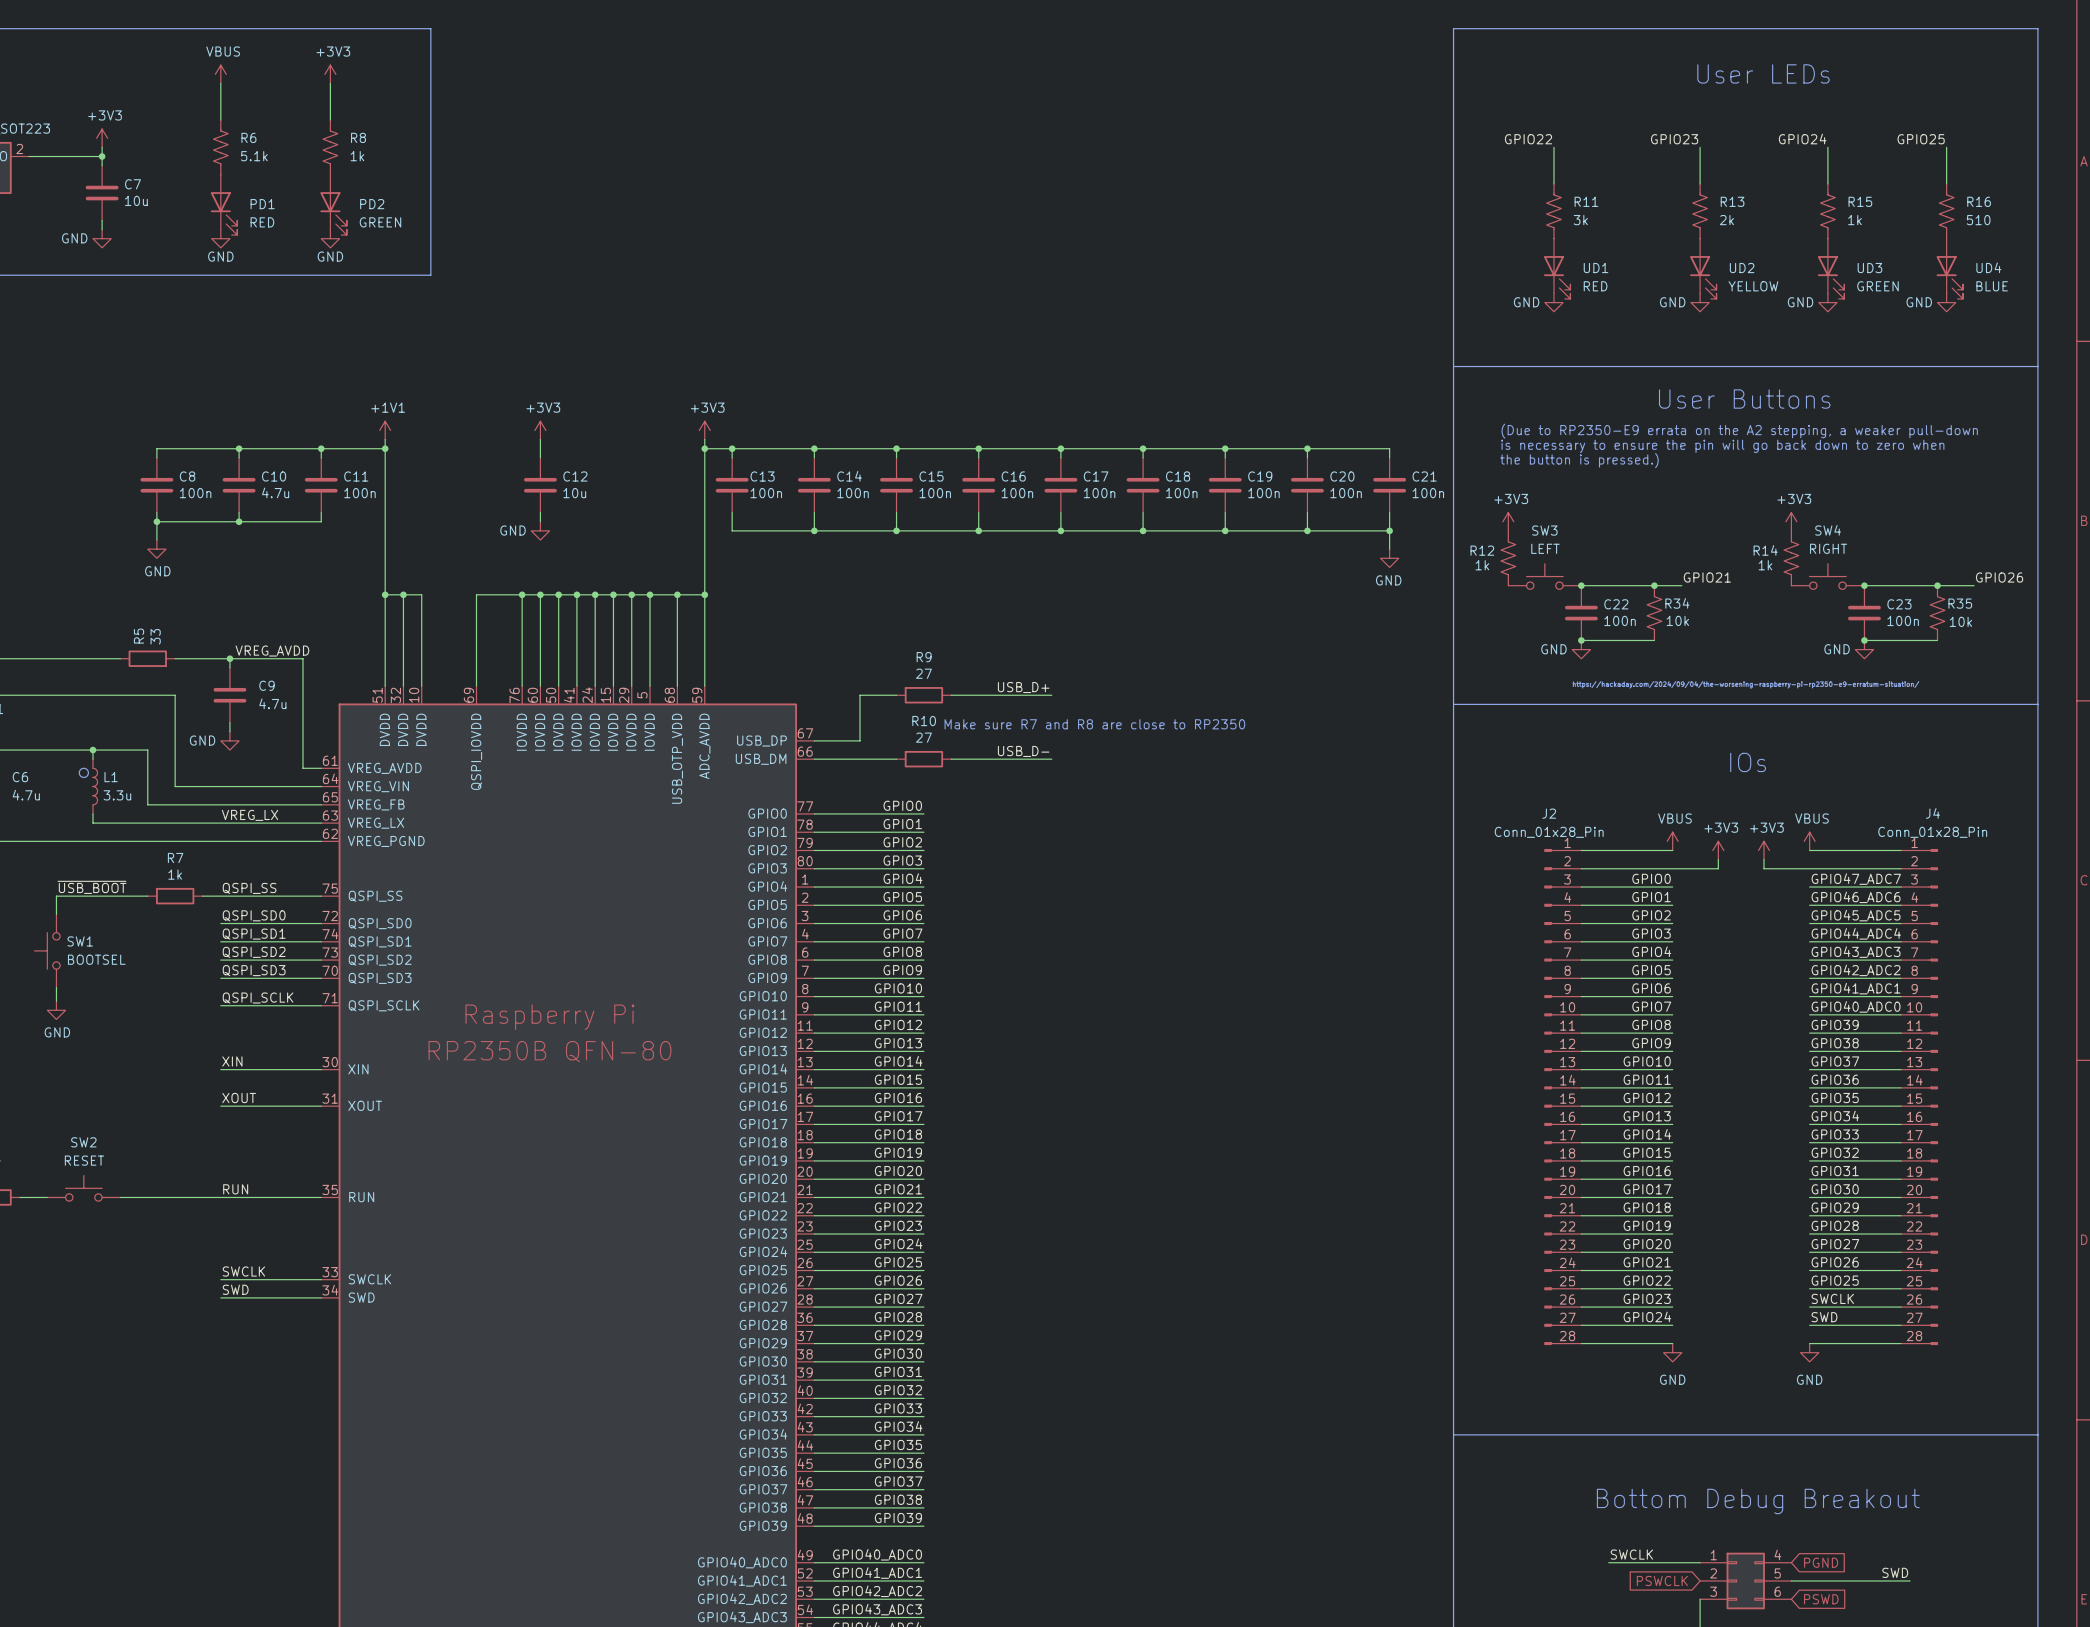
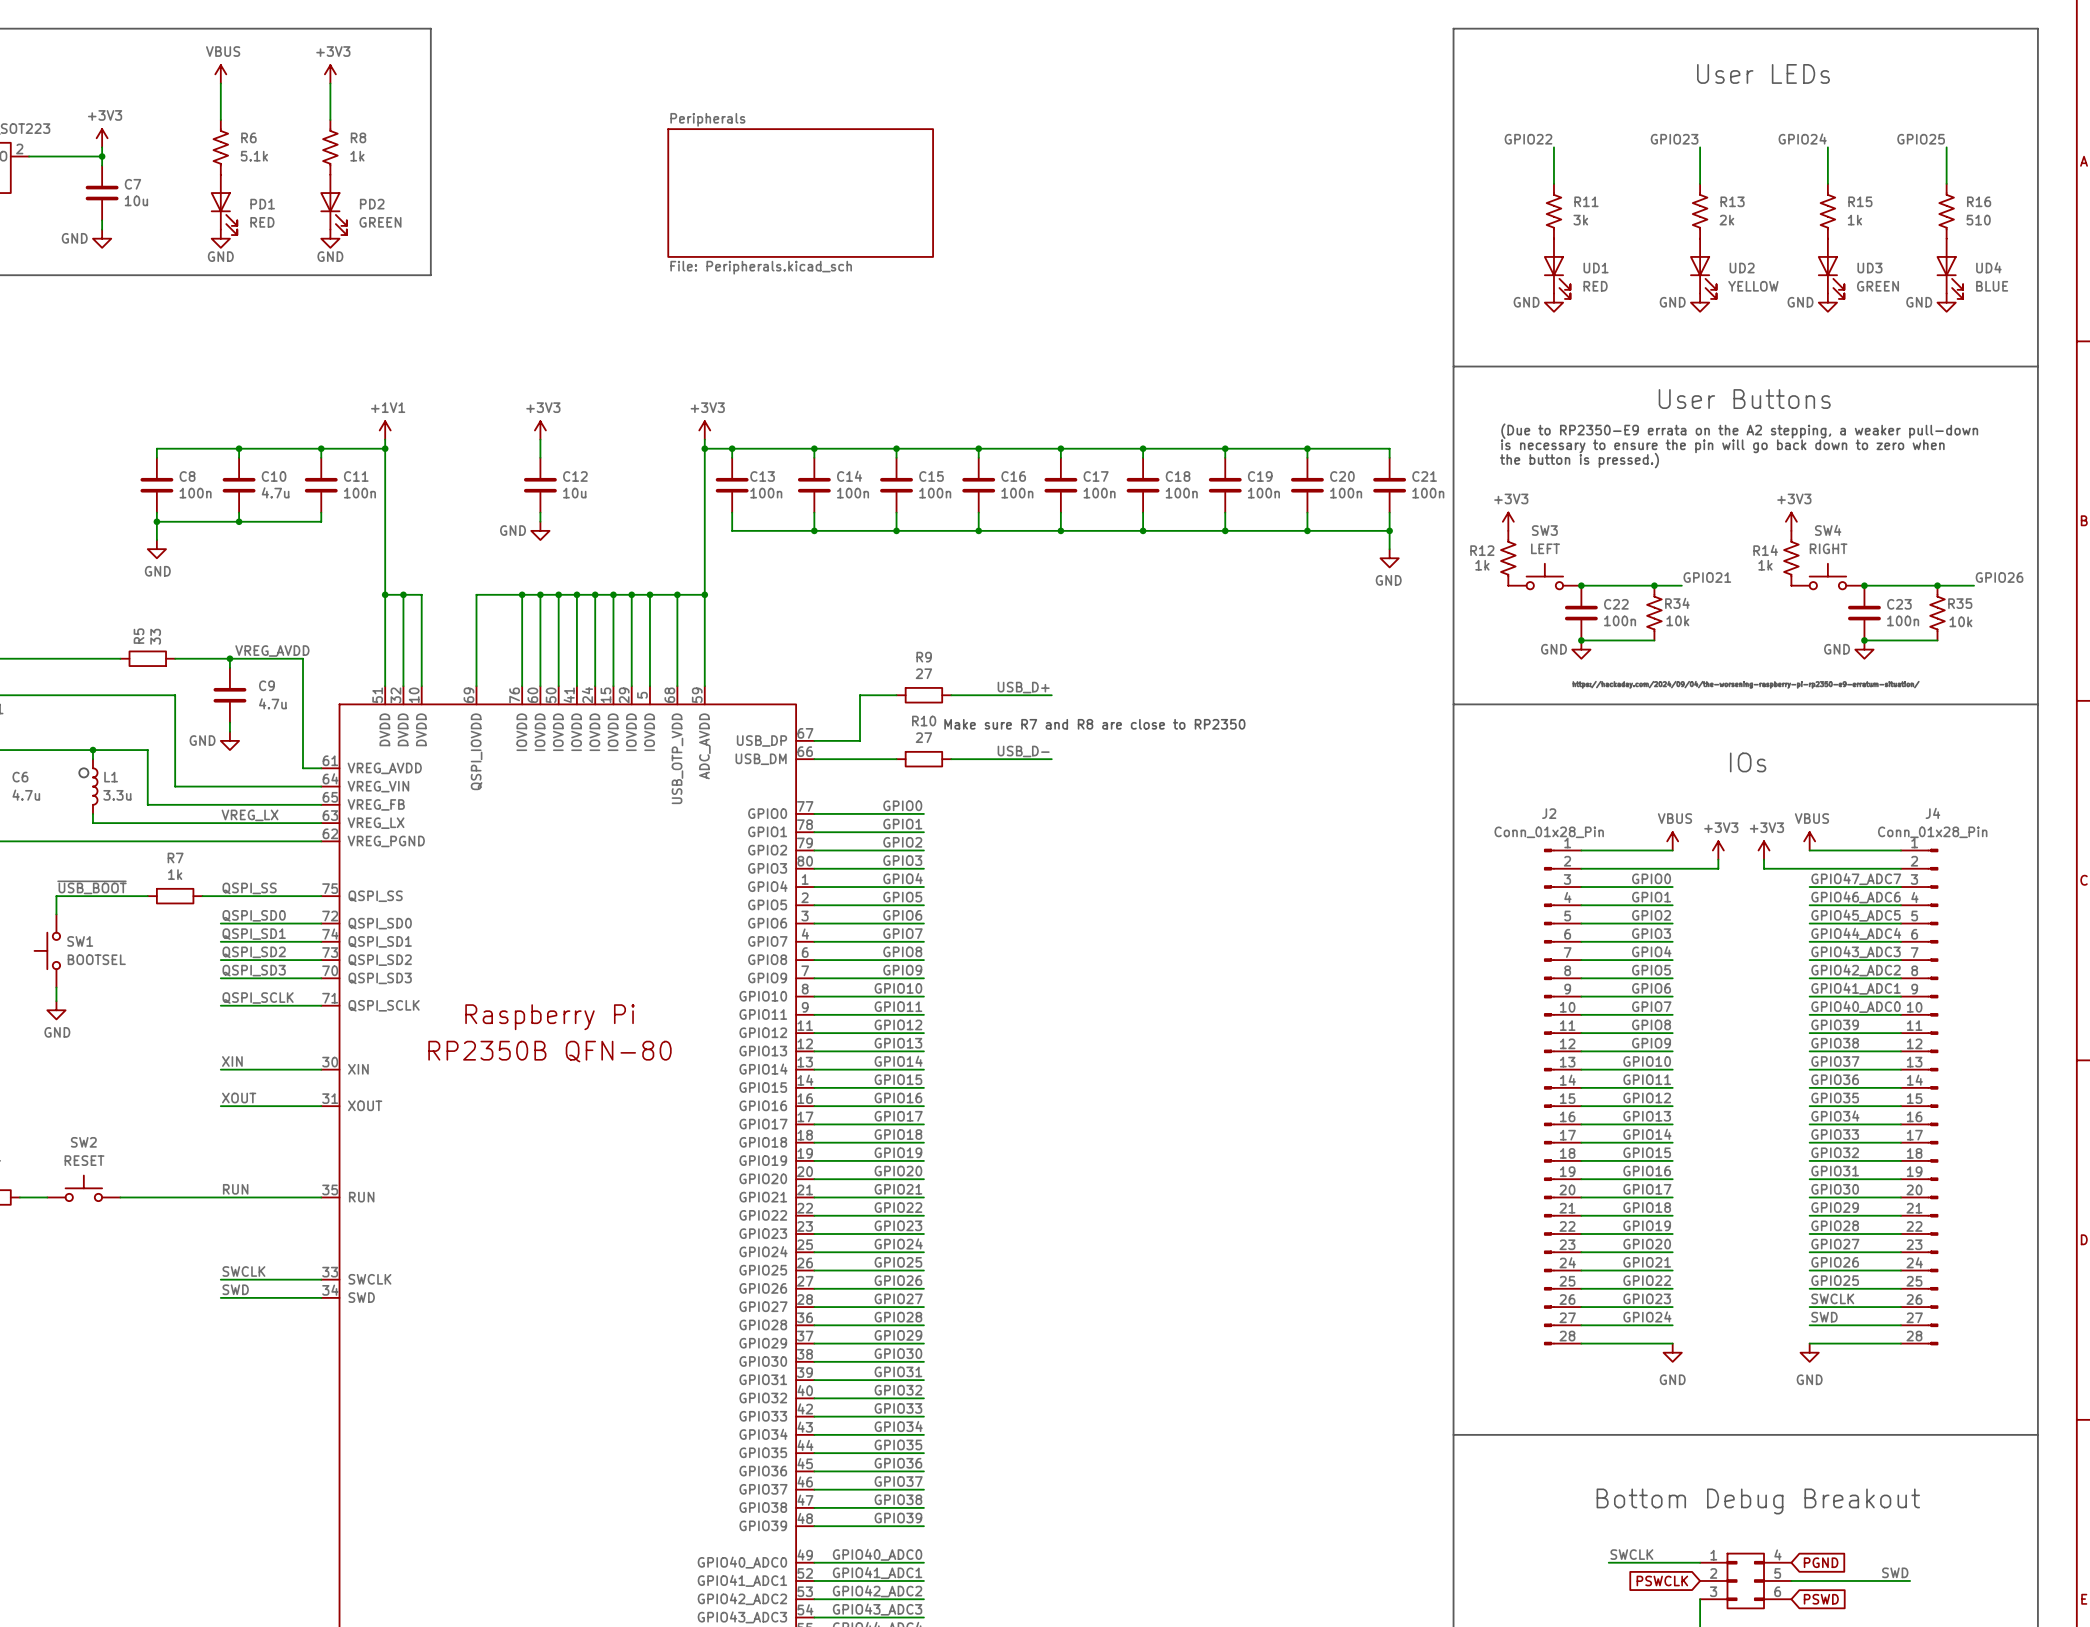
sheet Peripherals: none -> File: Peripherals.kicad_sch (800, 193)

